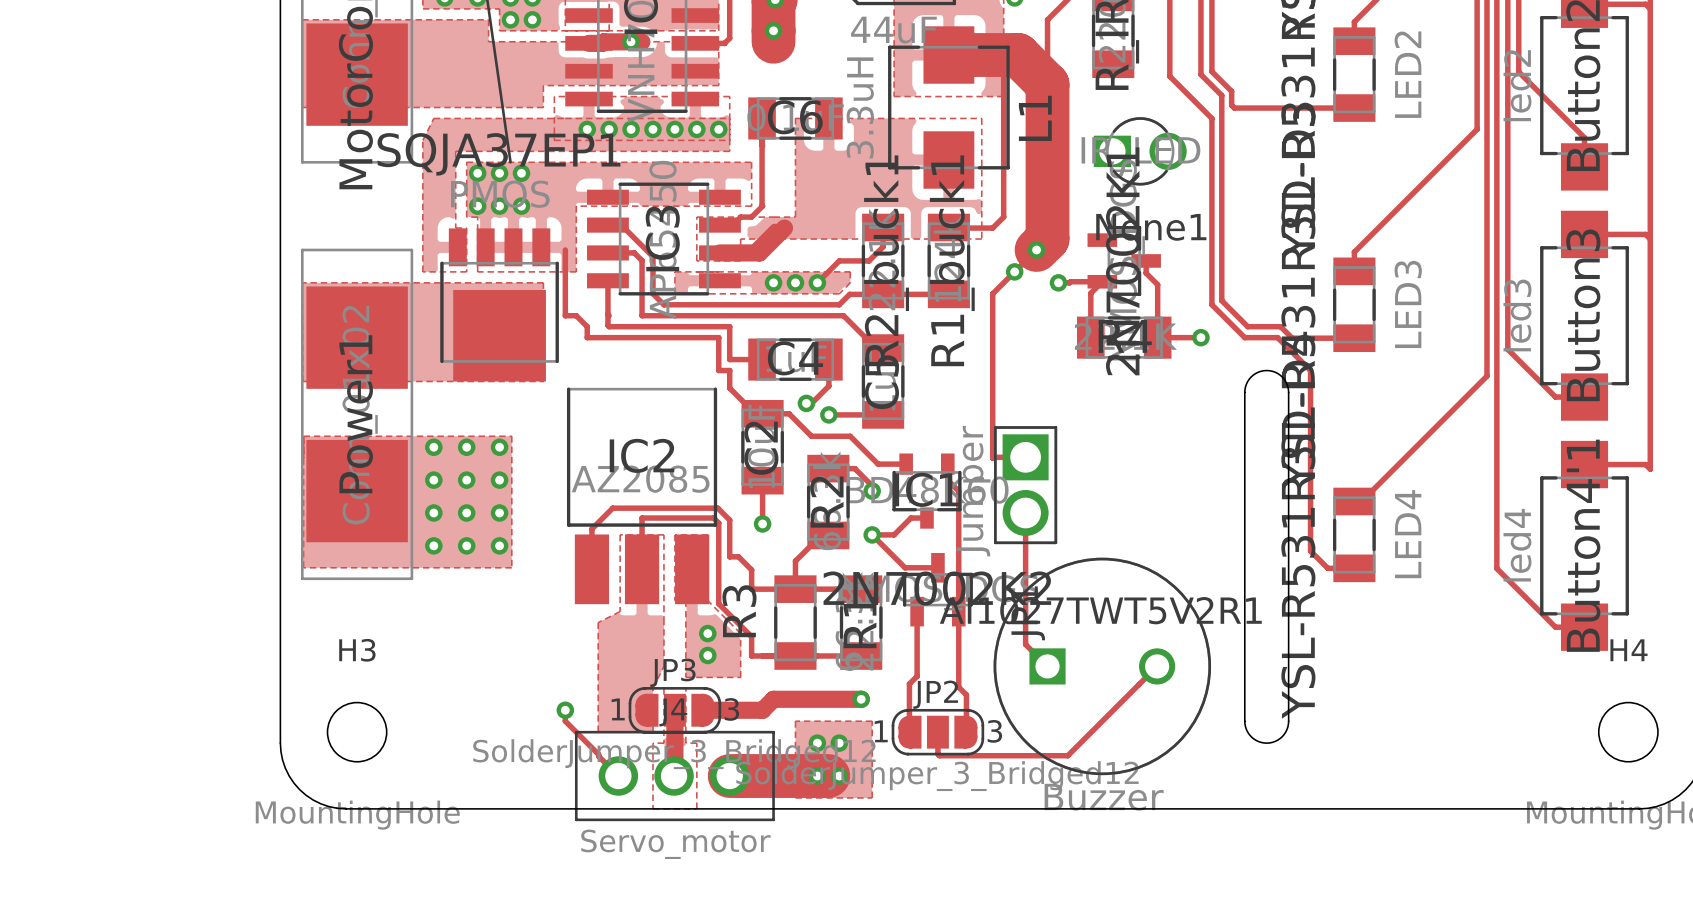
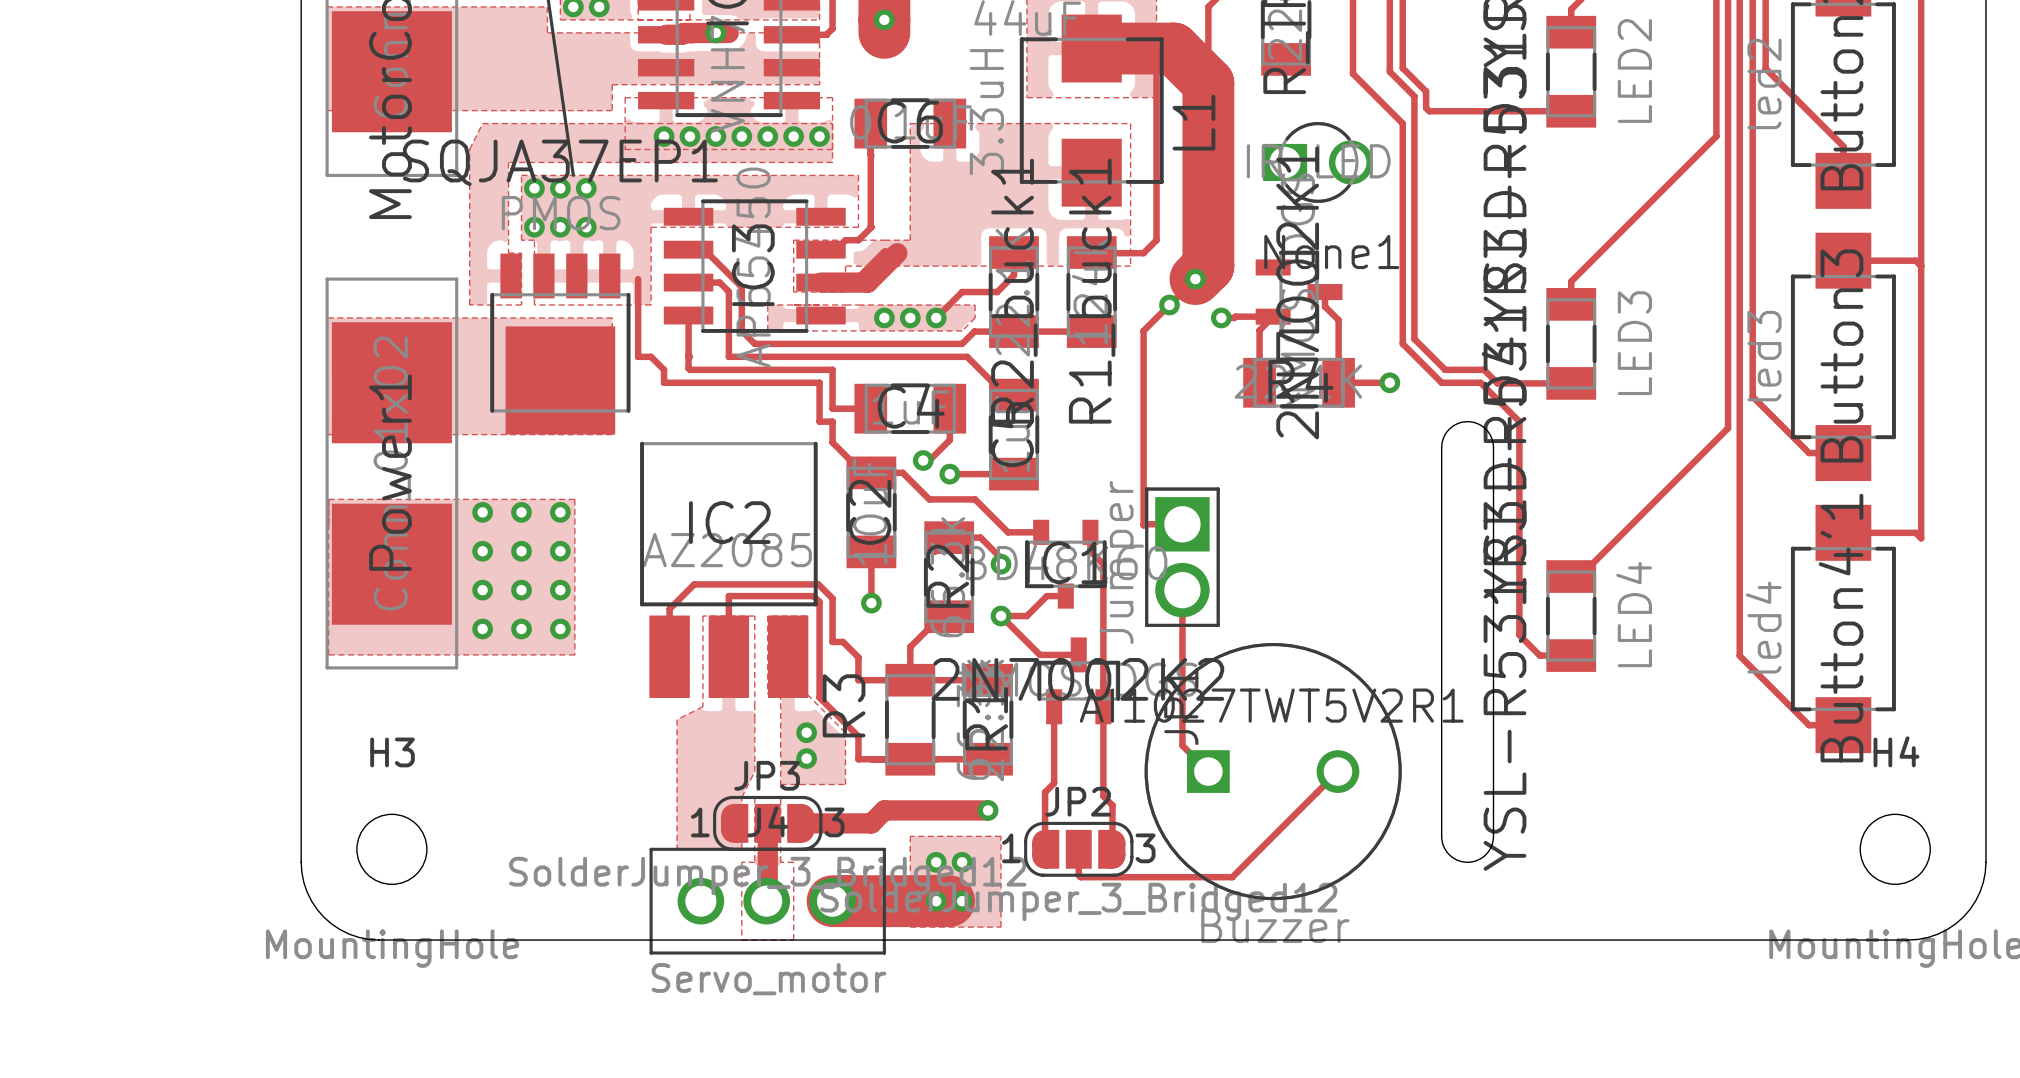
track: (565, 710) (565, 721) (618, 776) -> none
via: (565, 710) -> none

